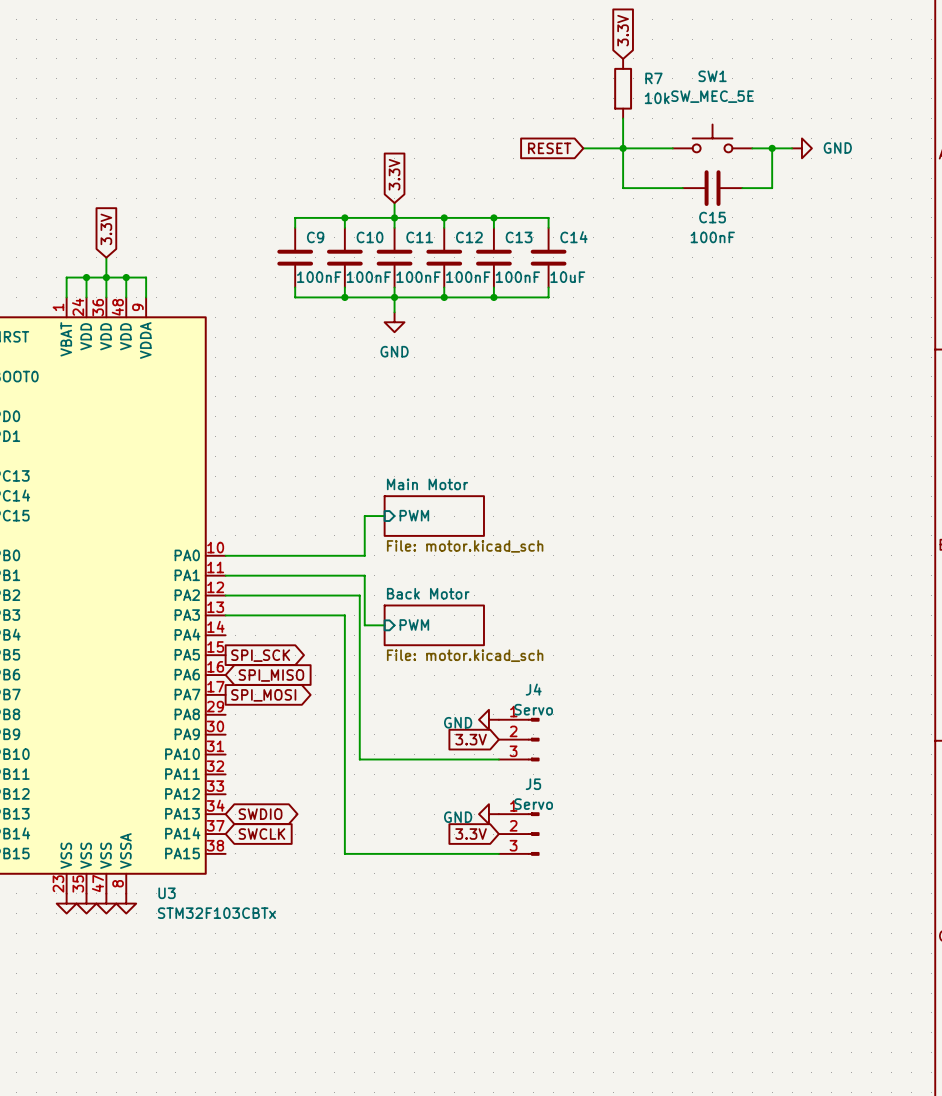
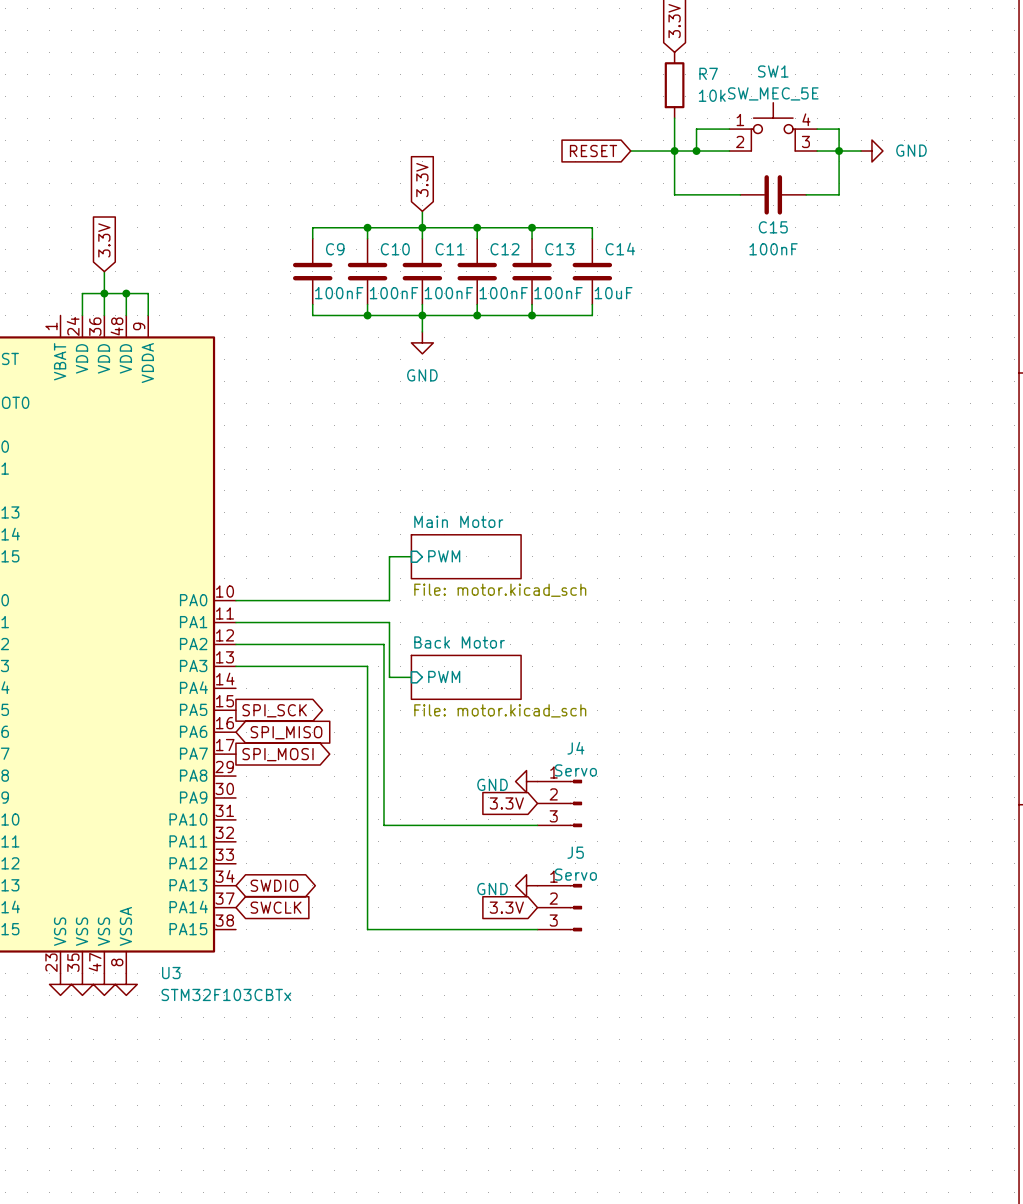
SW1 symbol: [672, 124, 753, 153] -> [729, 102, 818, 152]
wire: none -> (729, 129) (696, 129) (696, 151)
wire: none -> (817, 129) (839, 129) (839, 151)
junction: none -> (696, 151)
wire: (86, 277) (66, 277) (66, 297) -> none
junction: (86, 277) -> none

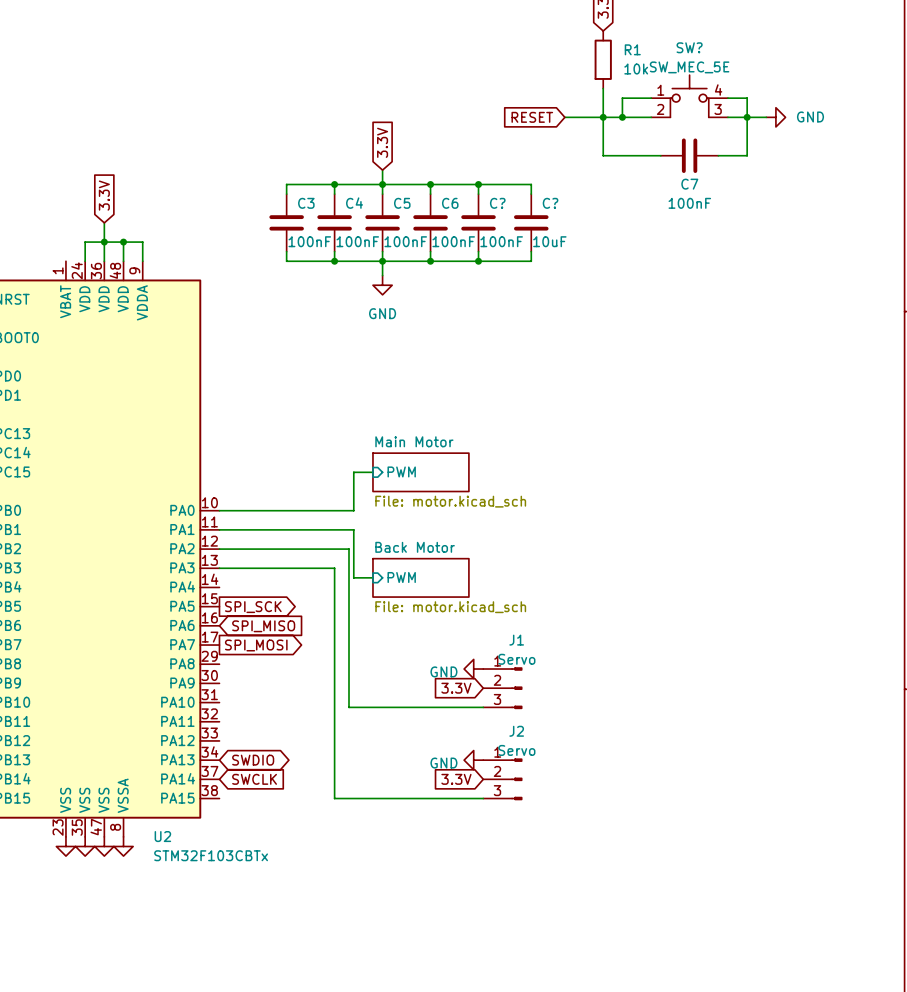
SW1 name: SW1 (773, 71) -> SW? (689, 47)
R7 name: R7 (708, 73) -> R1 (632, 49)
C15 name: C15 (773, 227) -> C7 (689, 184)
C9 name: C9 (335, 249) -> C3 (306, 203)
C10 name: C10 (395, 249) -> C4 (354, 203)
C11 name: C11 (450, 249) -> C5 (402, 203)
C12 name: C12 (504, 249) -> C6 (450, 203)
C13 name: C13 (559, 249) -> C? (497, 203)
C14 name: C14 (620, 249) -> C? (550, 203)
J4 name: J4 (575, 748) -> J1 (516, 640)
J5 name: J5 (575, 852) -> J2 (516, 731)
U3 name: U3 (171, 973) -> U2 (162, 836)

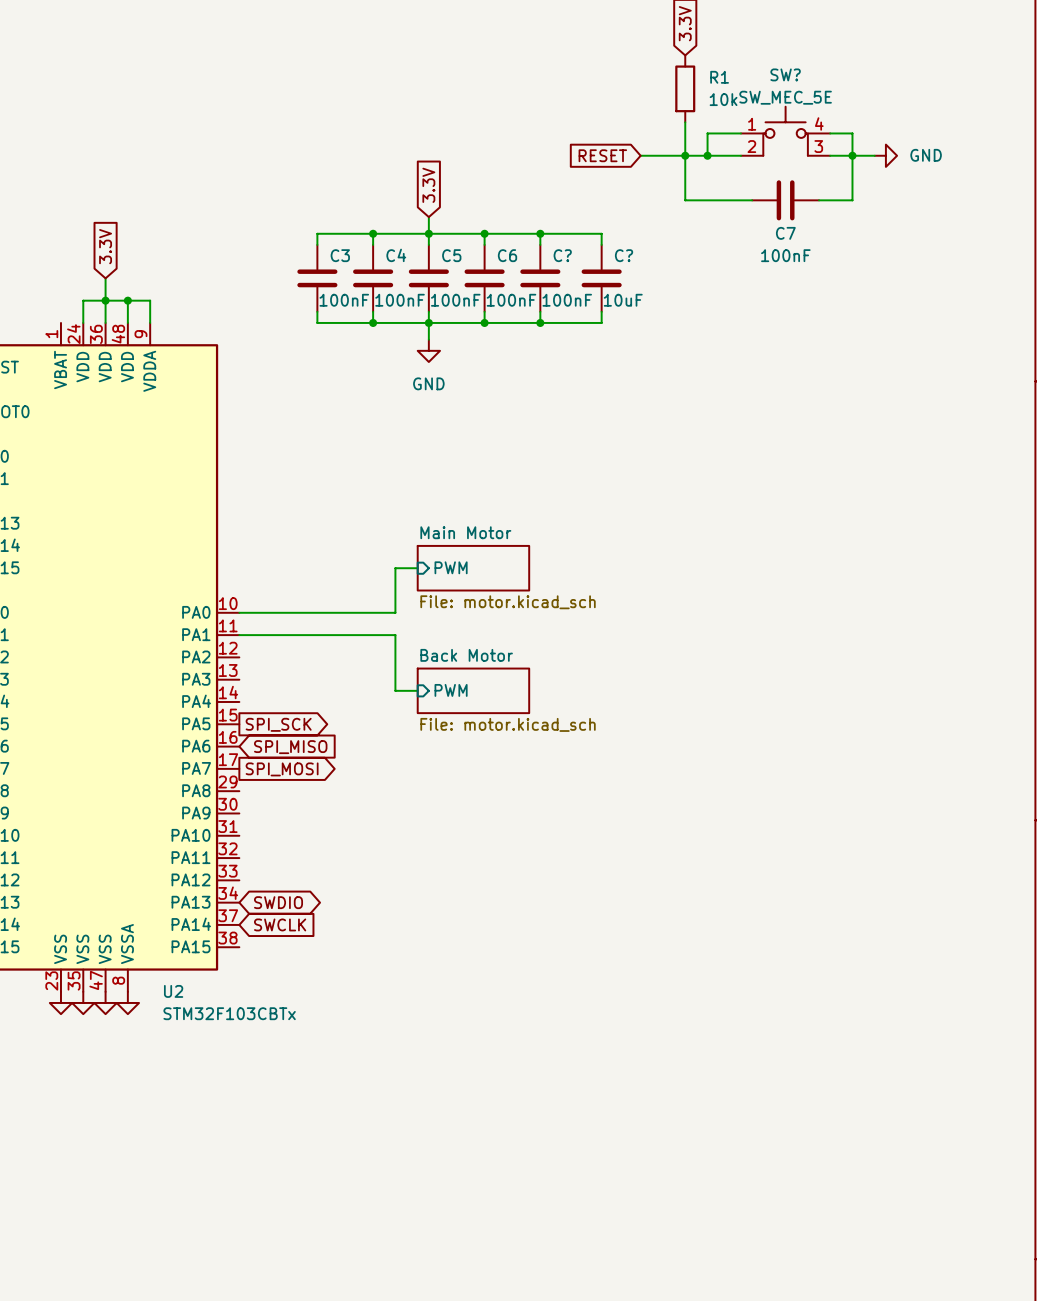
wire: (219, 549) (348, 549) (348, 707) (483, 707) -> none
wire: (219, 568) (334, 568) (334, 798) (483, 798) -> none
power symbol: GND (473, 669) -> none
global label: 3.3V (456, 688) -> none
J1: Servo (502, 688) -> none
power symbol: GND (473, 760) -> none
global label: 3.3V (456, 779) -> none
J2: Servo (502, 779) -> none

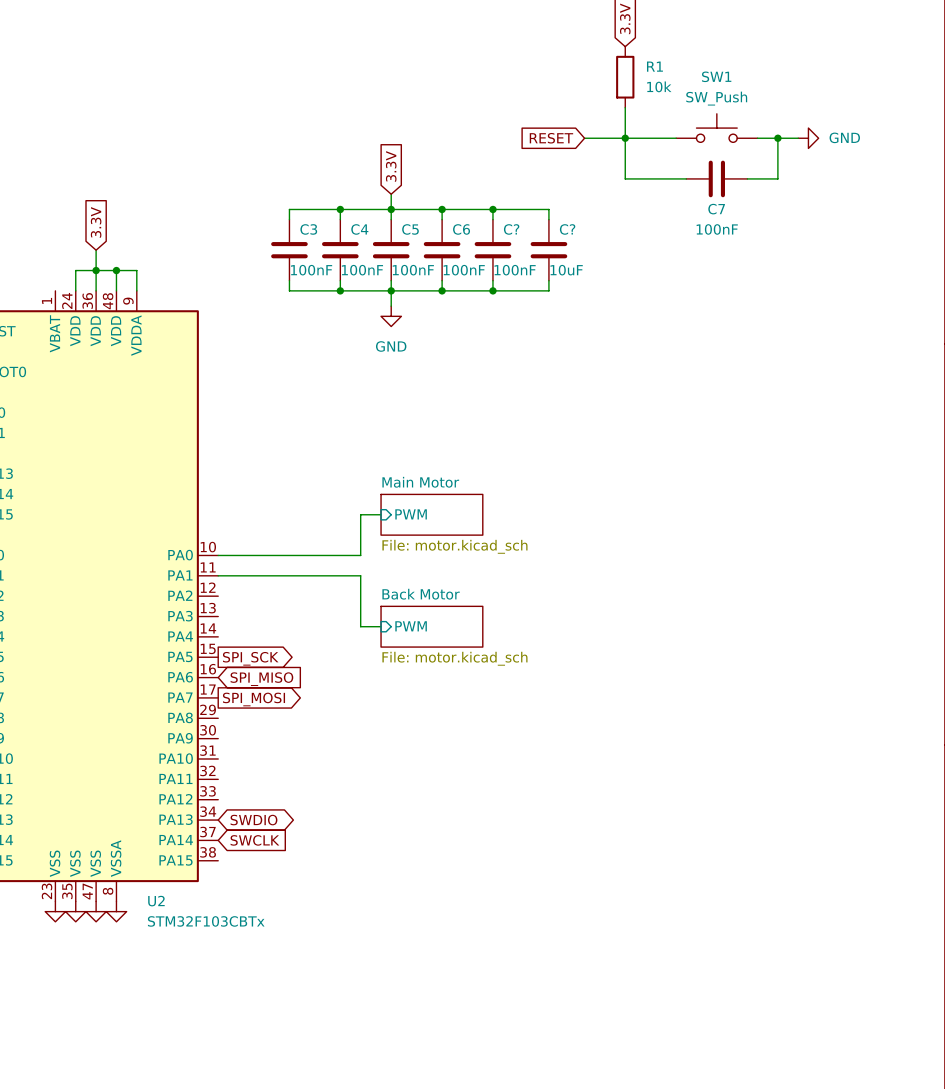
SW?: SW_MEC_5E (785, 131) -> none
wire: (741, 133) (707, 133) (707, 155) -> none
wire: (830, 133) (852, 133) (852, 155) -> none
SW1: none -> SW_Push (716, 128)
junction: (707, 155) -> none

